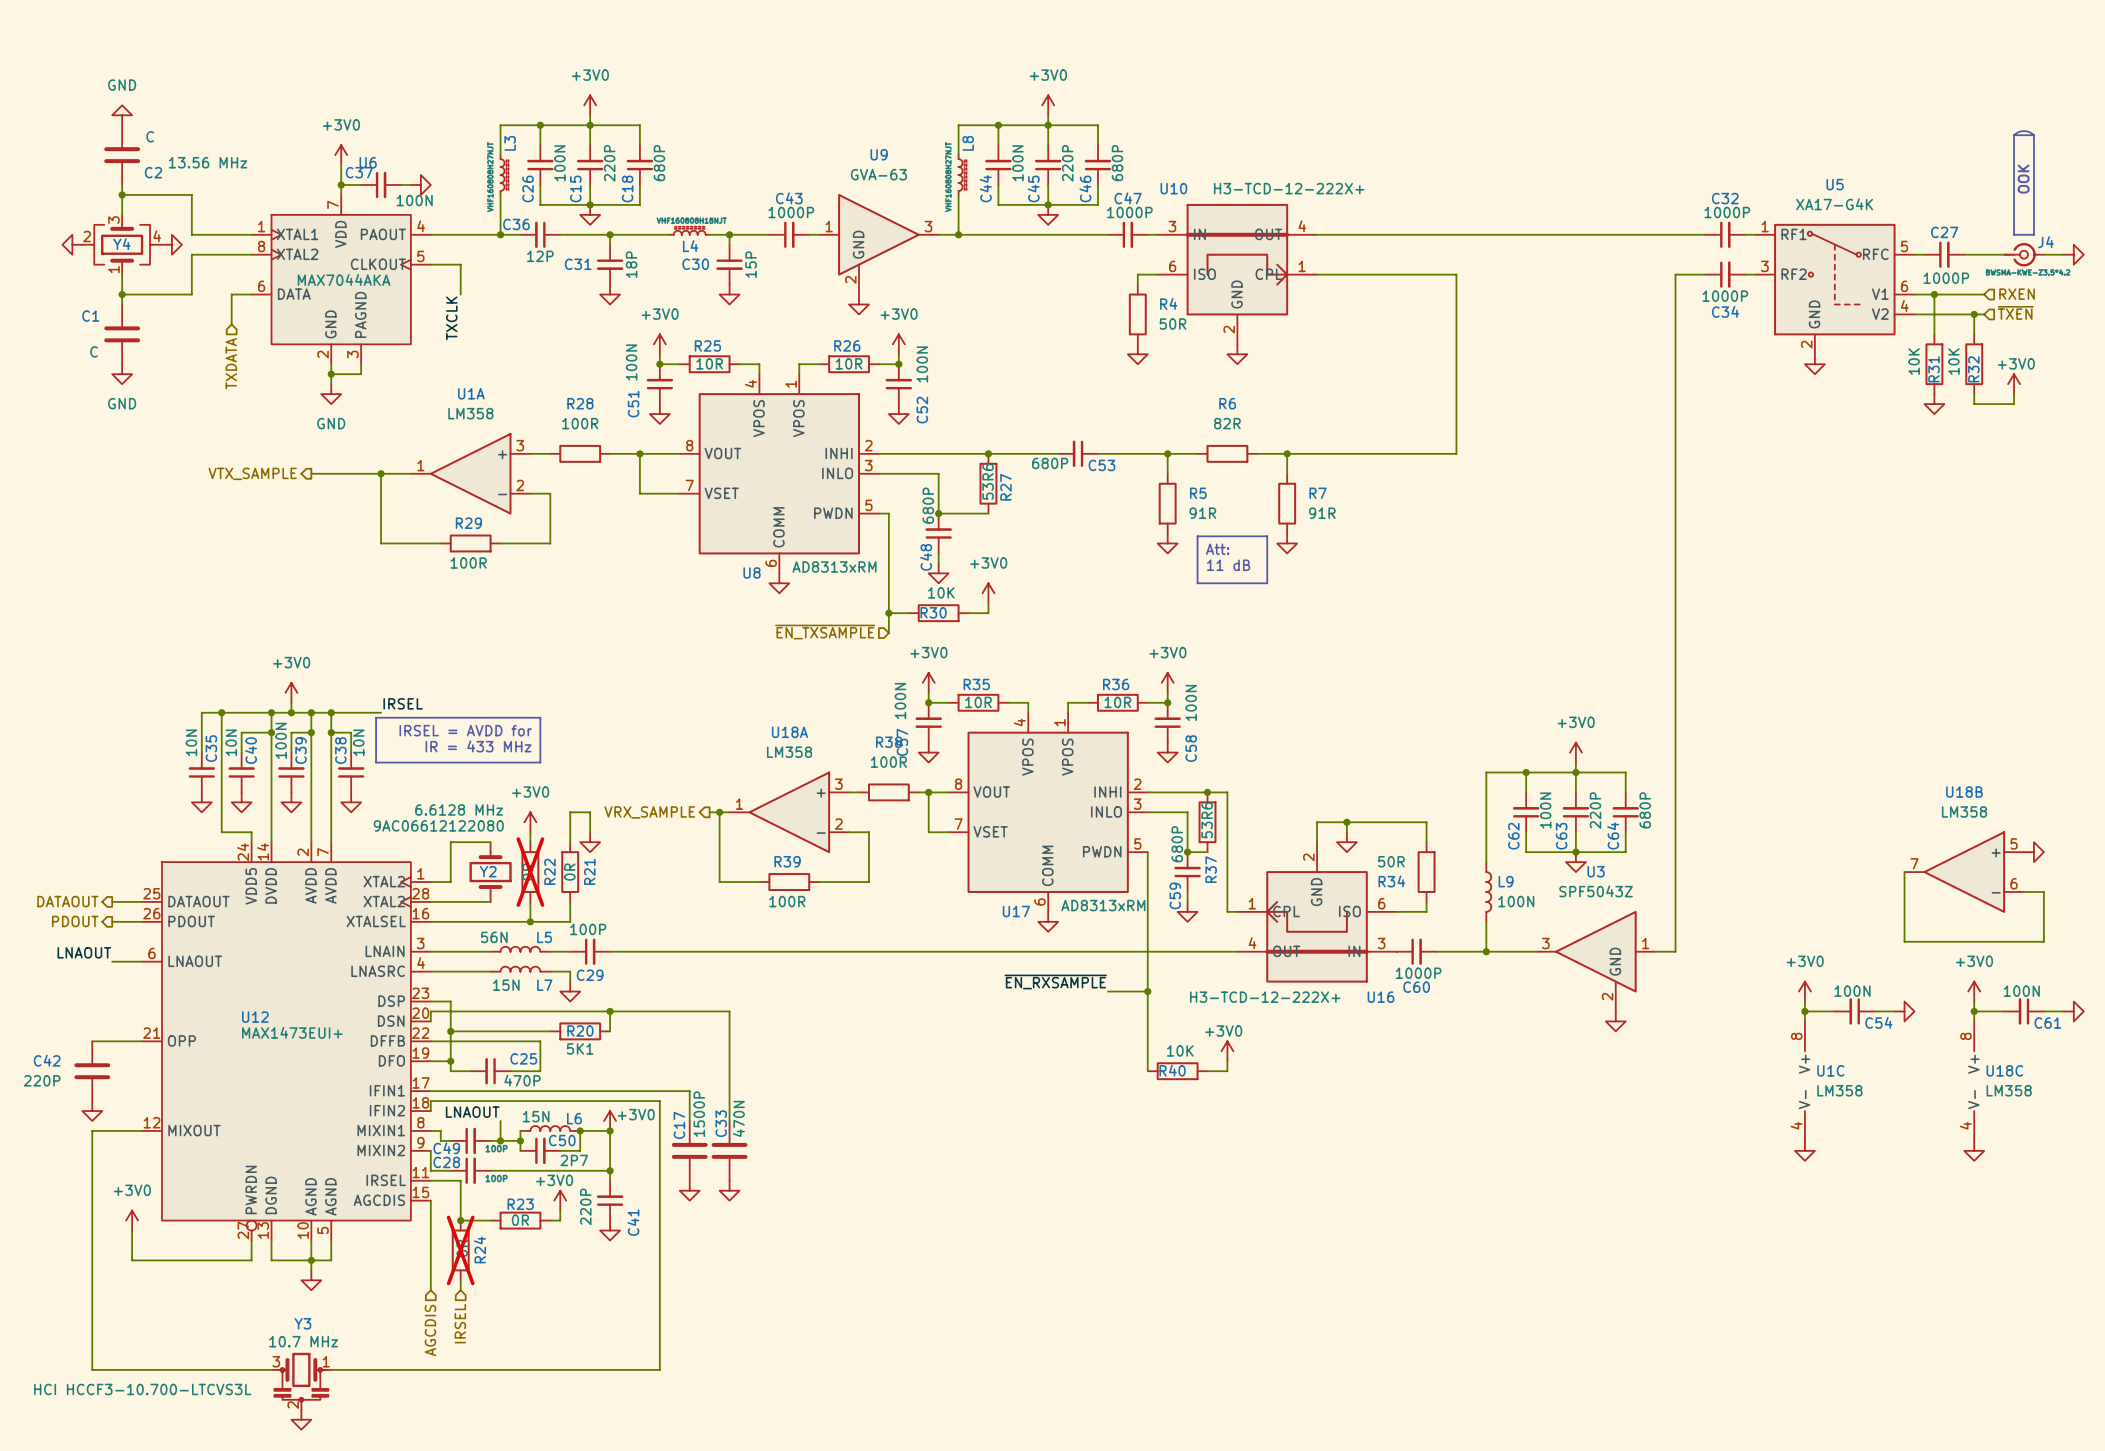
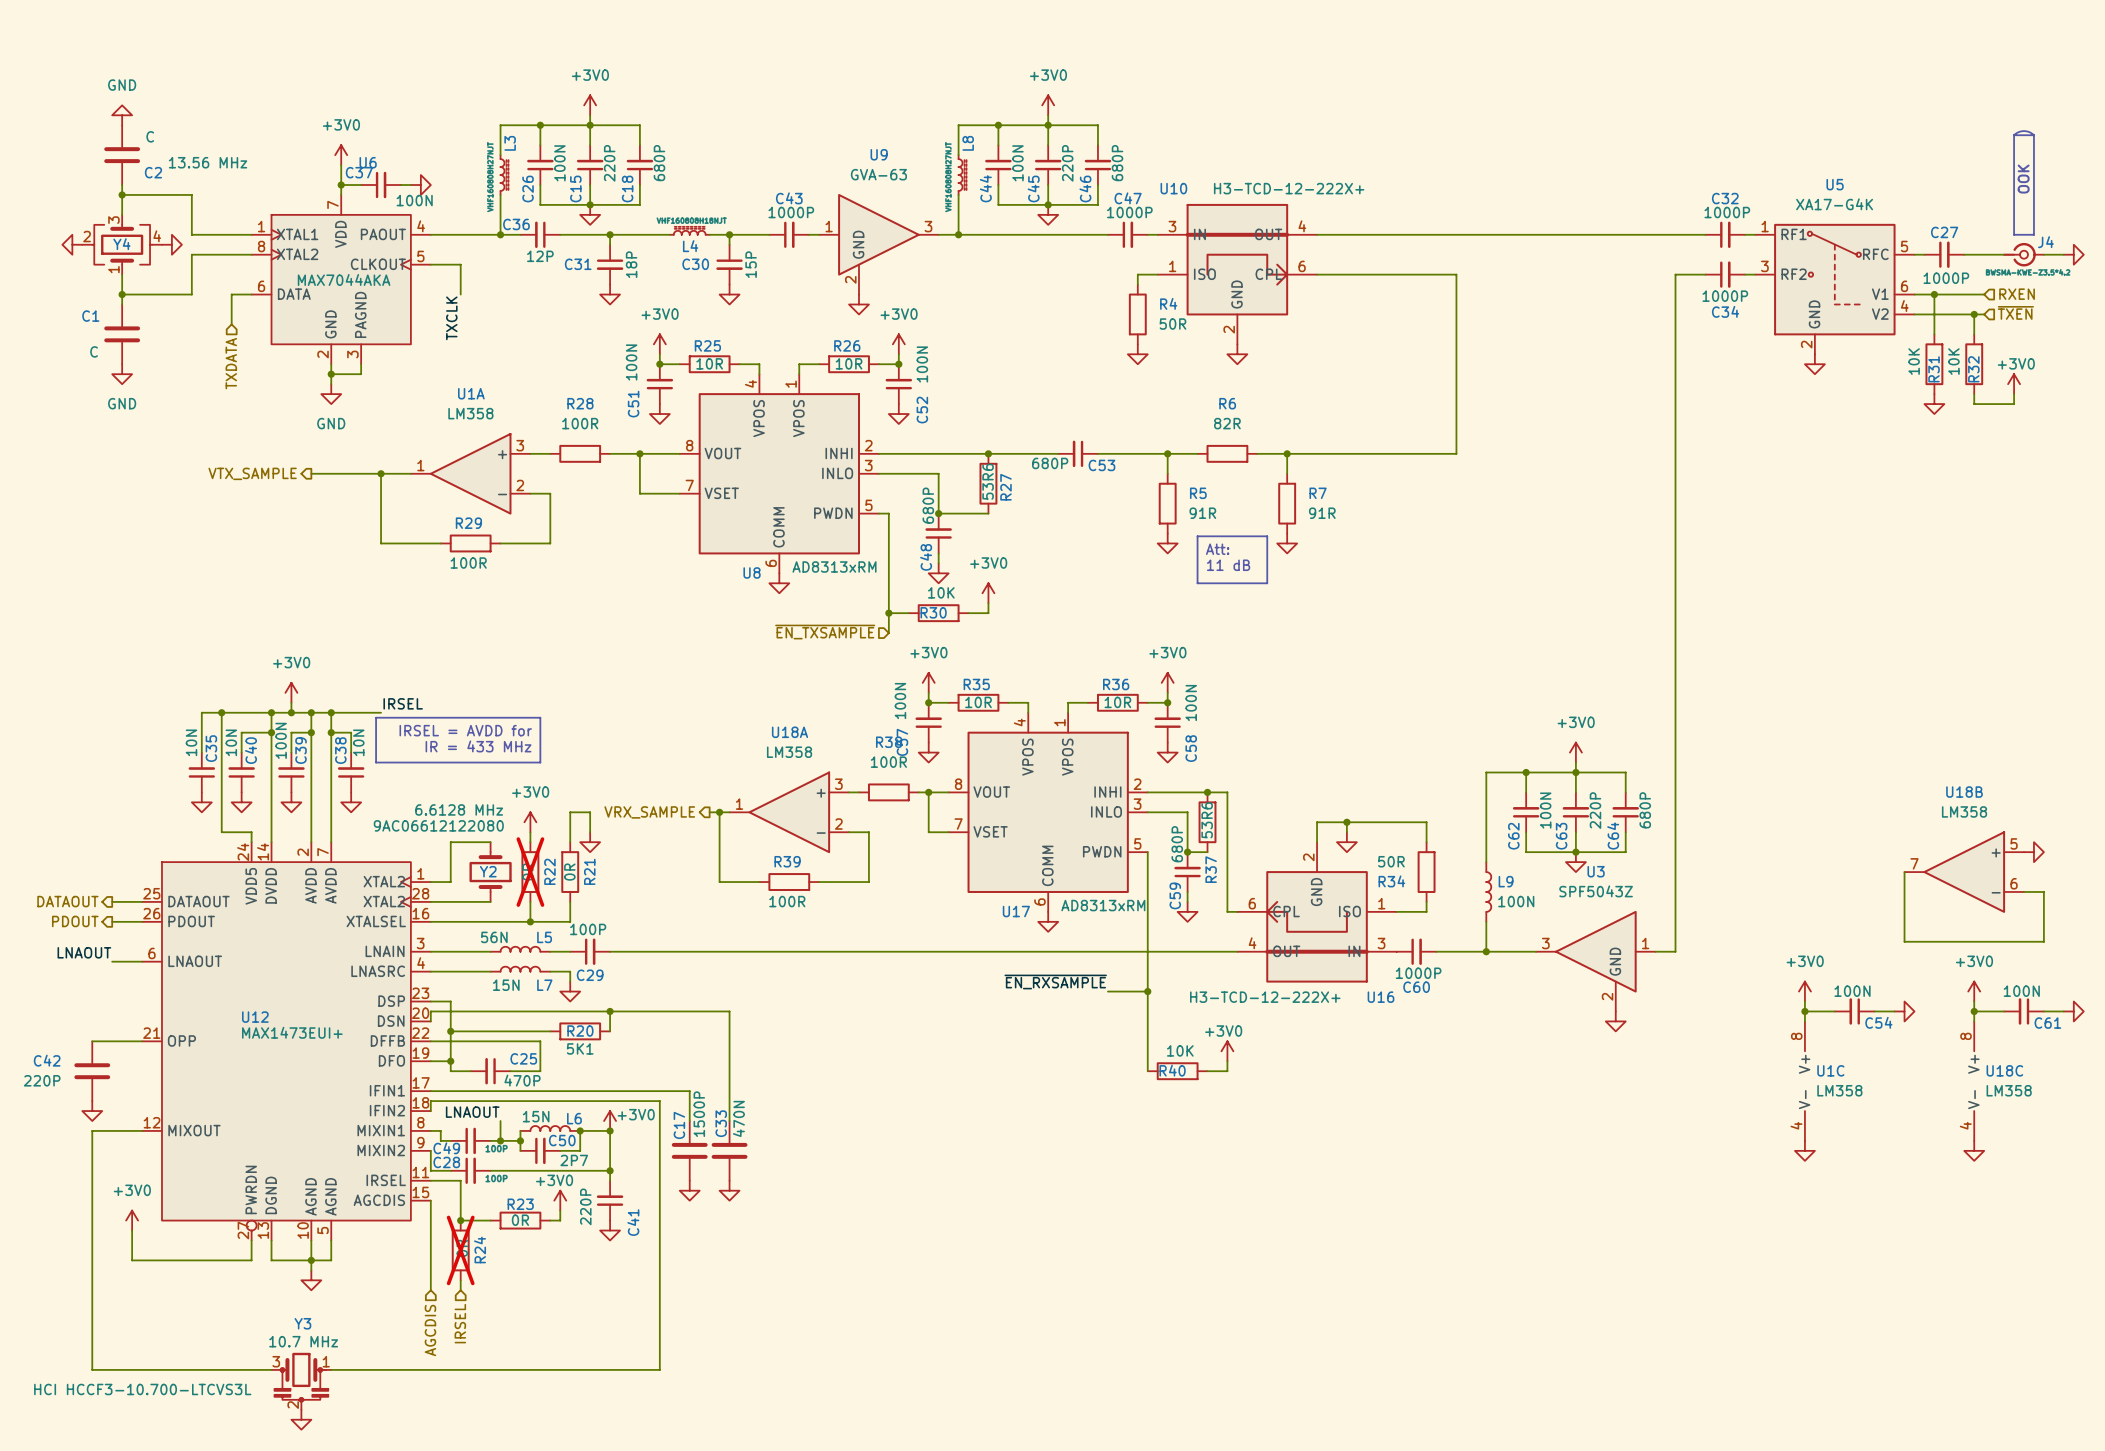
U10 pin number: 6 (1172, 266) -> 1 (1172, 266)
U10 pin number: 1 (1302, 266) -> 6 (1302, 266)
U16 pin number: 1 (1252, 903) -> 6 (1252, 903)
U16 pin number: 6 (1381, 903) -> 1 (1381, 903)

